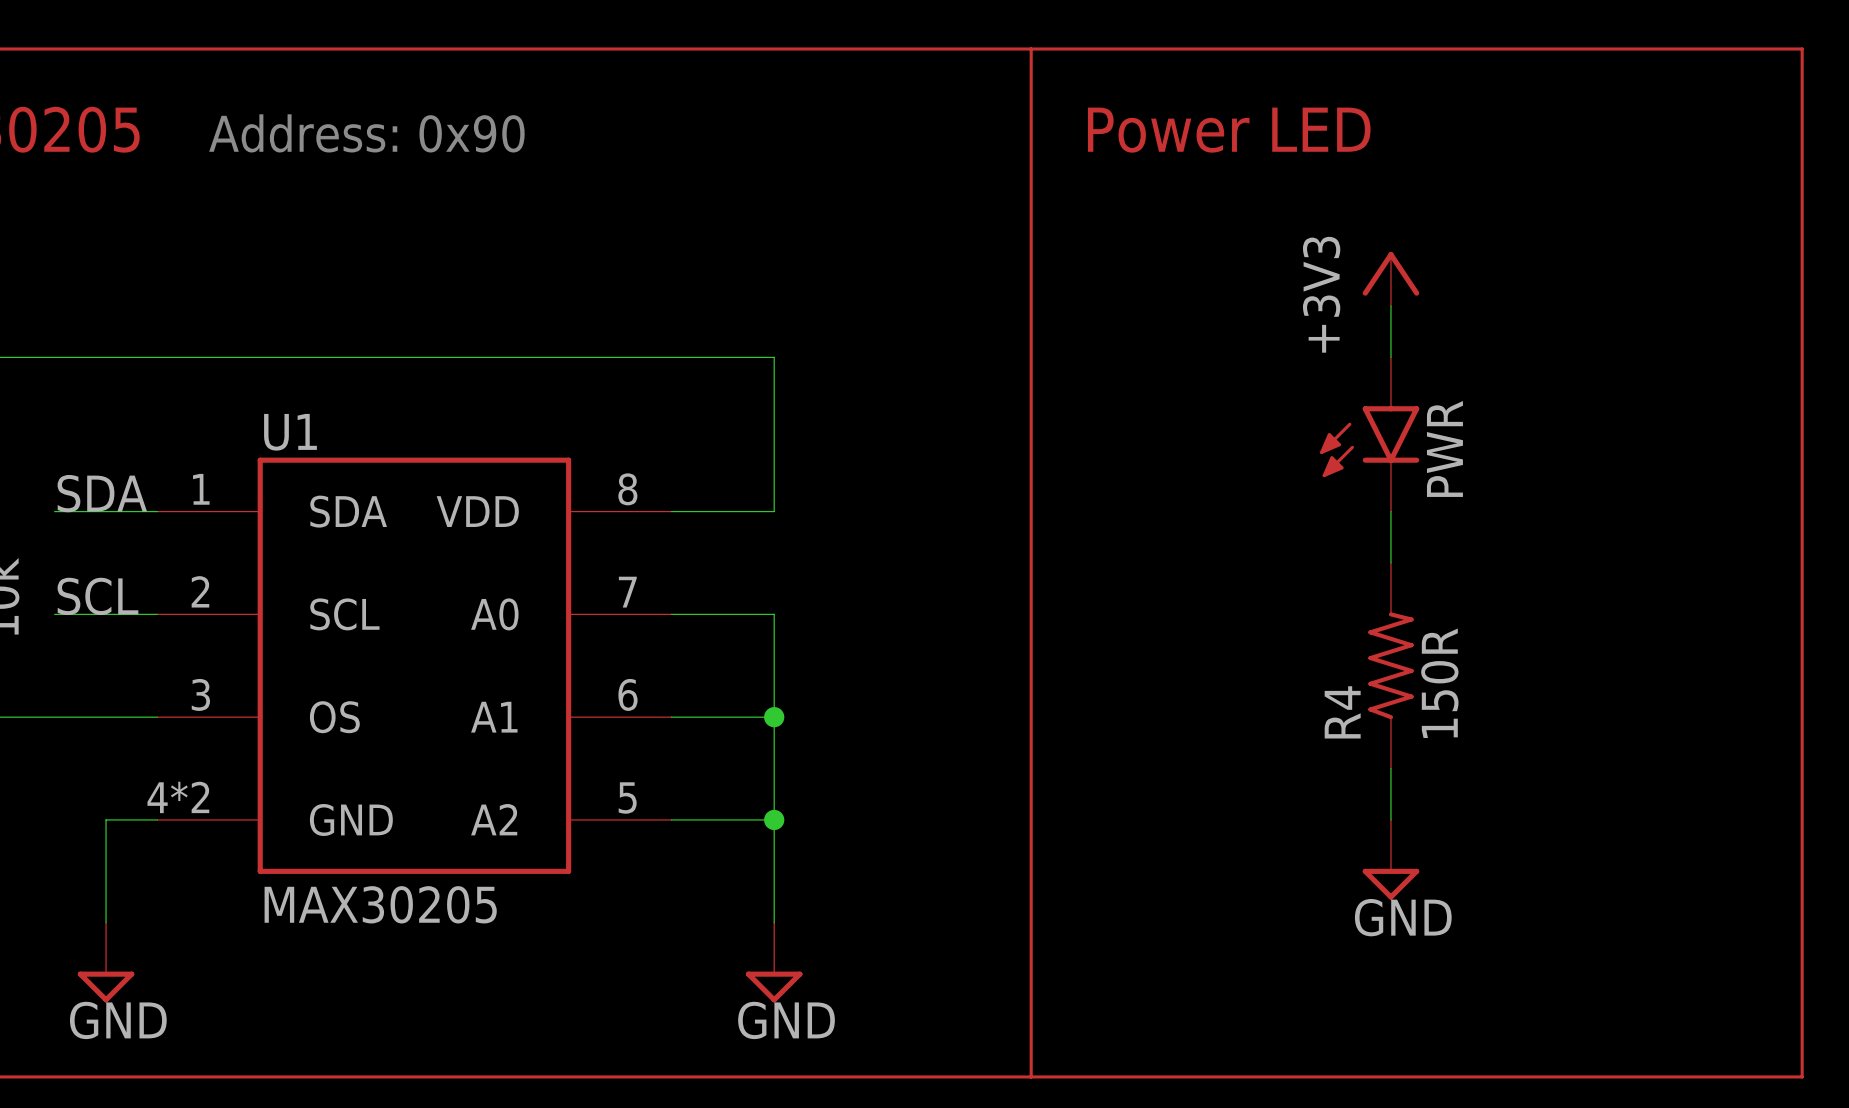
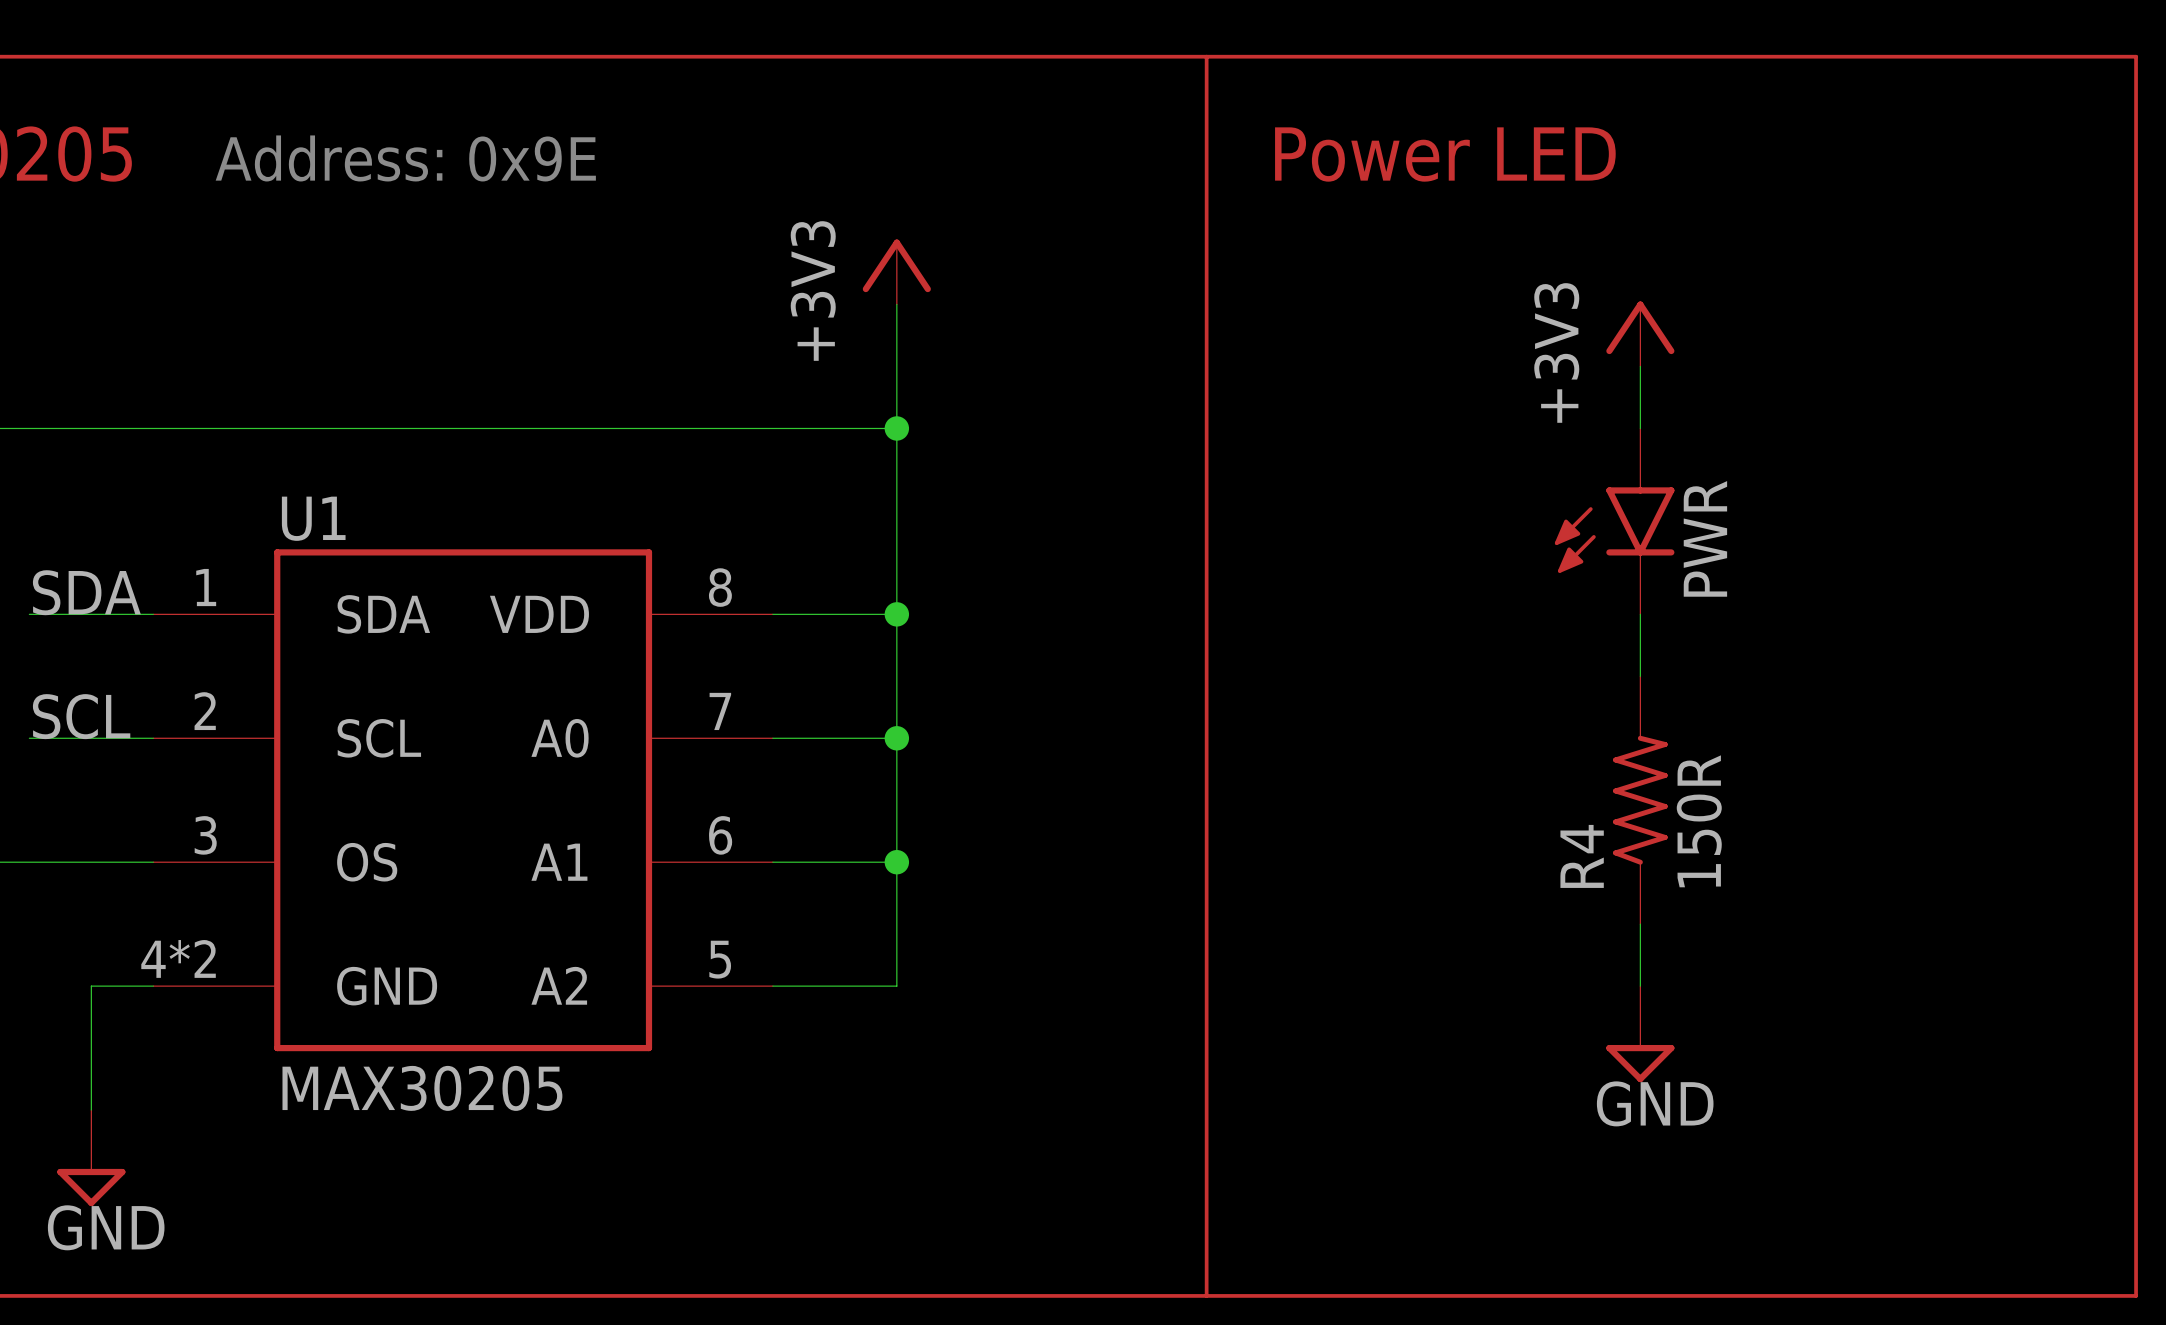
text: Address: 0x90 (366, 133) -> Address: 0x9E (405, 158)
power symbol: none -> +3V3 (896, 272)
wire: none -> (896, 304) (896, 428)
junction: none -> (896, 428)
junction: none -> (896, 614)
junction: none -> (896, 738)
wire: (774, 819) (774, 922) -> (896, 614) (896, 738)
junction: (774, 819) -> none
power symbol: GND (774, 962) -> none

